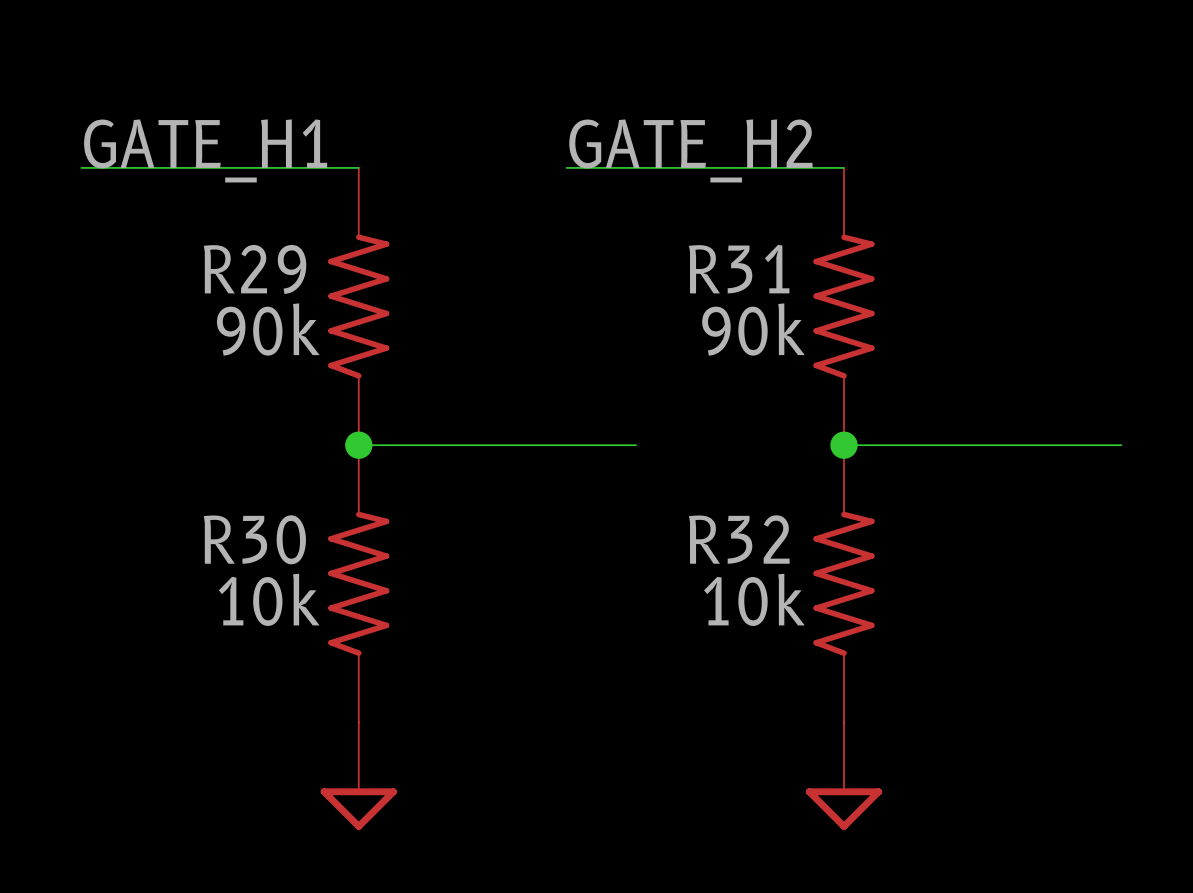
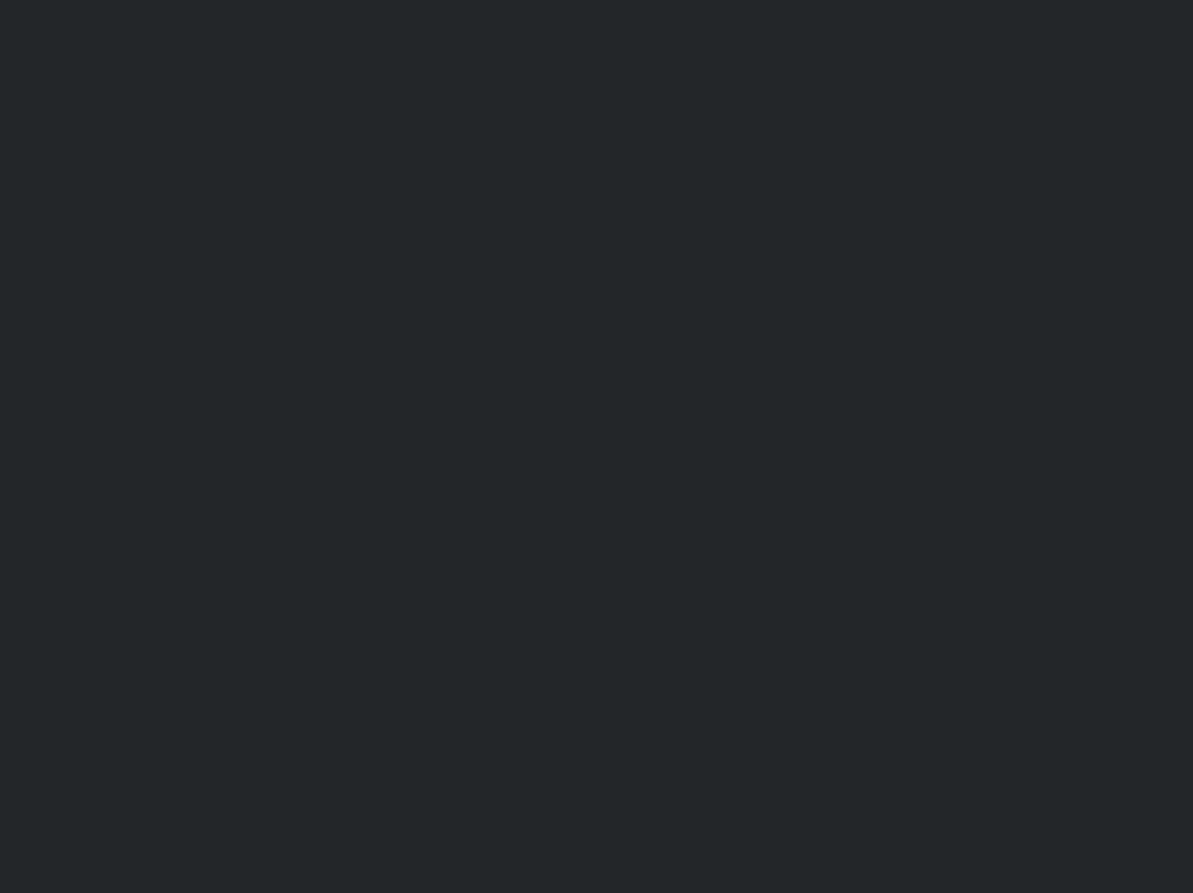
label: GATE_H1 (205, 150) -> none
label: GATE_H2 (690, 150) -> none
wire: (81, 167) (358, 167) -> none
wire: (566, 167) (843, 167) -> none
R29: 90k (358, 306) -> none
R31: 90k (843, 306) -> none
wire: (358, 445) (636, 445) -> none
junction: (358, 445) -> none
wire: (843, 445) (1121, 445) -> none
junction: (843, 445) -> none
R30: 10k (358, 583) -> none
R32: 10k (843, 583) -> none
power symbol: (358, 776) -> none
power symbol: (843, 776) -> none

